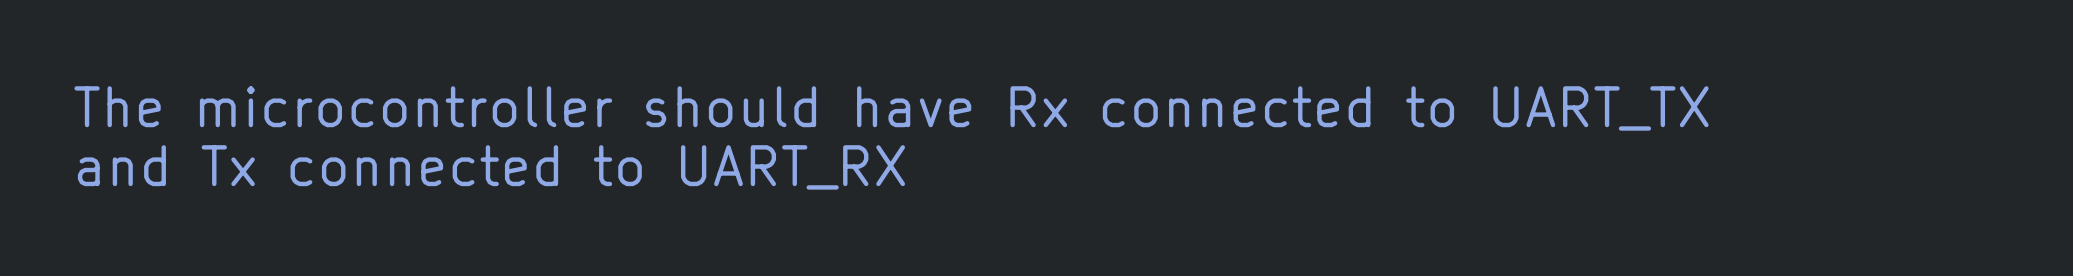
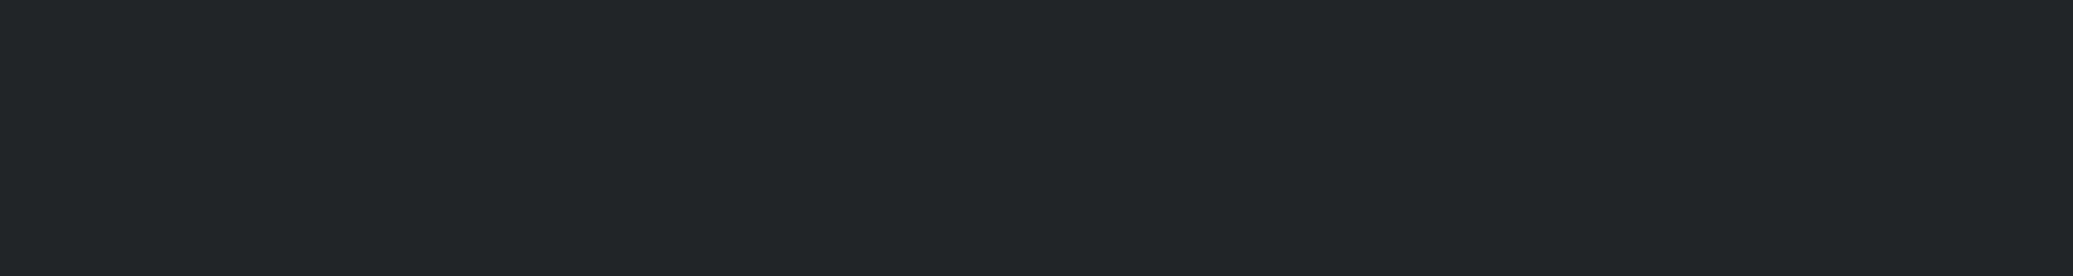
text: The microcontroller should have Rx connected to UART_TX (891, 108) -> none
text: and Tx connected to UART_RX (491, 167) -> none

